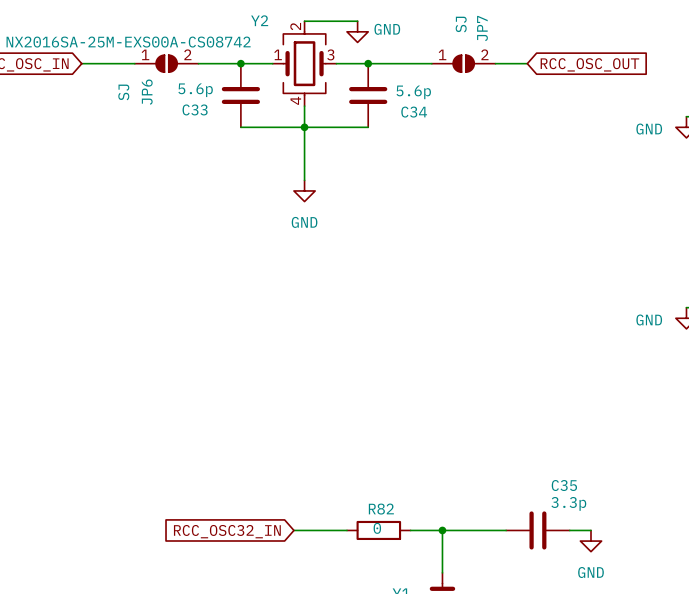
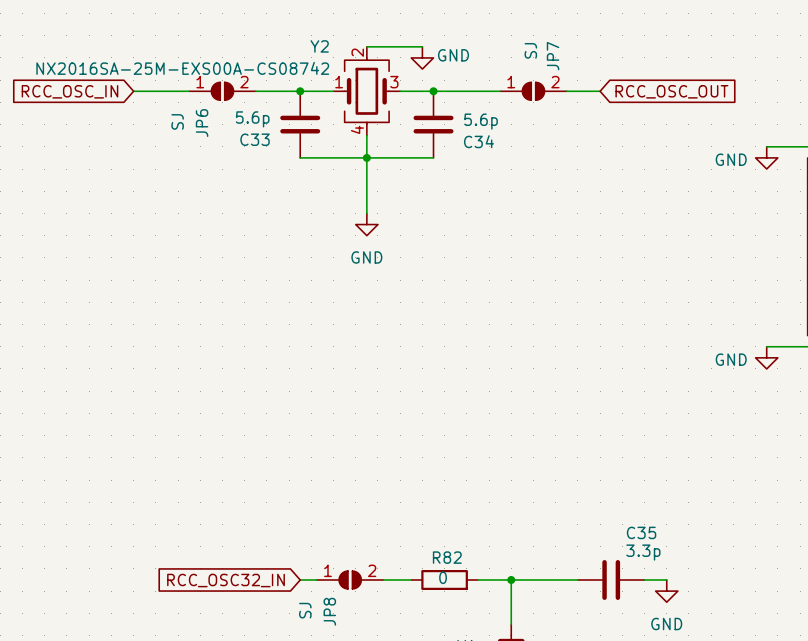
wire: none -> (300, 579) (316, 579)
JP8: none -> SJ (350, 579)
global label position: RCC_OSC32_IN (227, 531) -> RCC_OSC32_IN (226, 580)

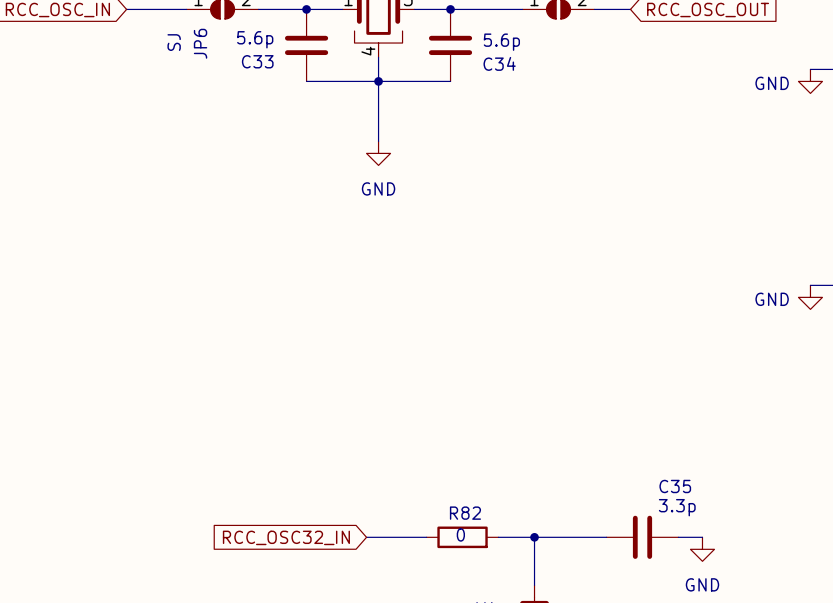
wire: (300, 579) (316, 579) -> none
JP8: SJ (350, 579) -> none
global label position: RCC_OSC32_IN (226, 580) -> RCC_OSC32_IN (286, 537)

